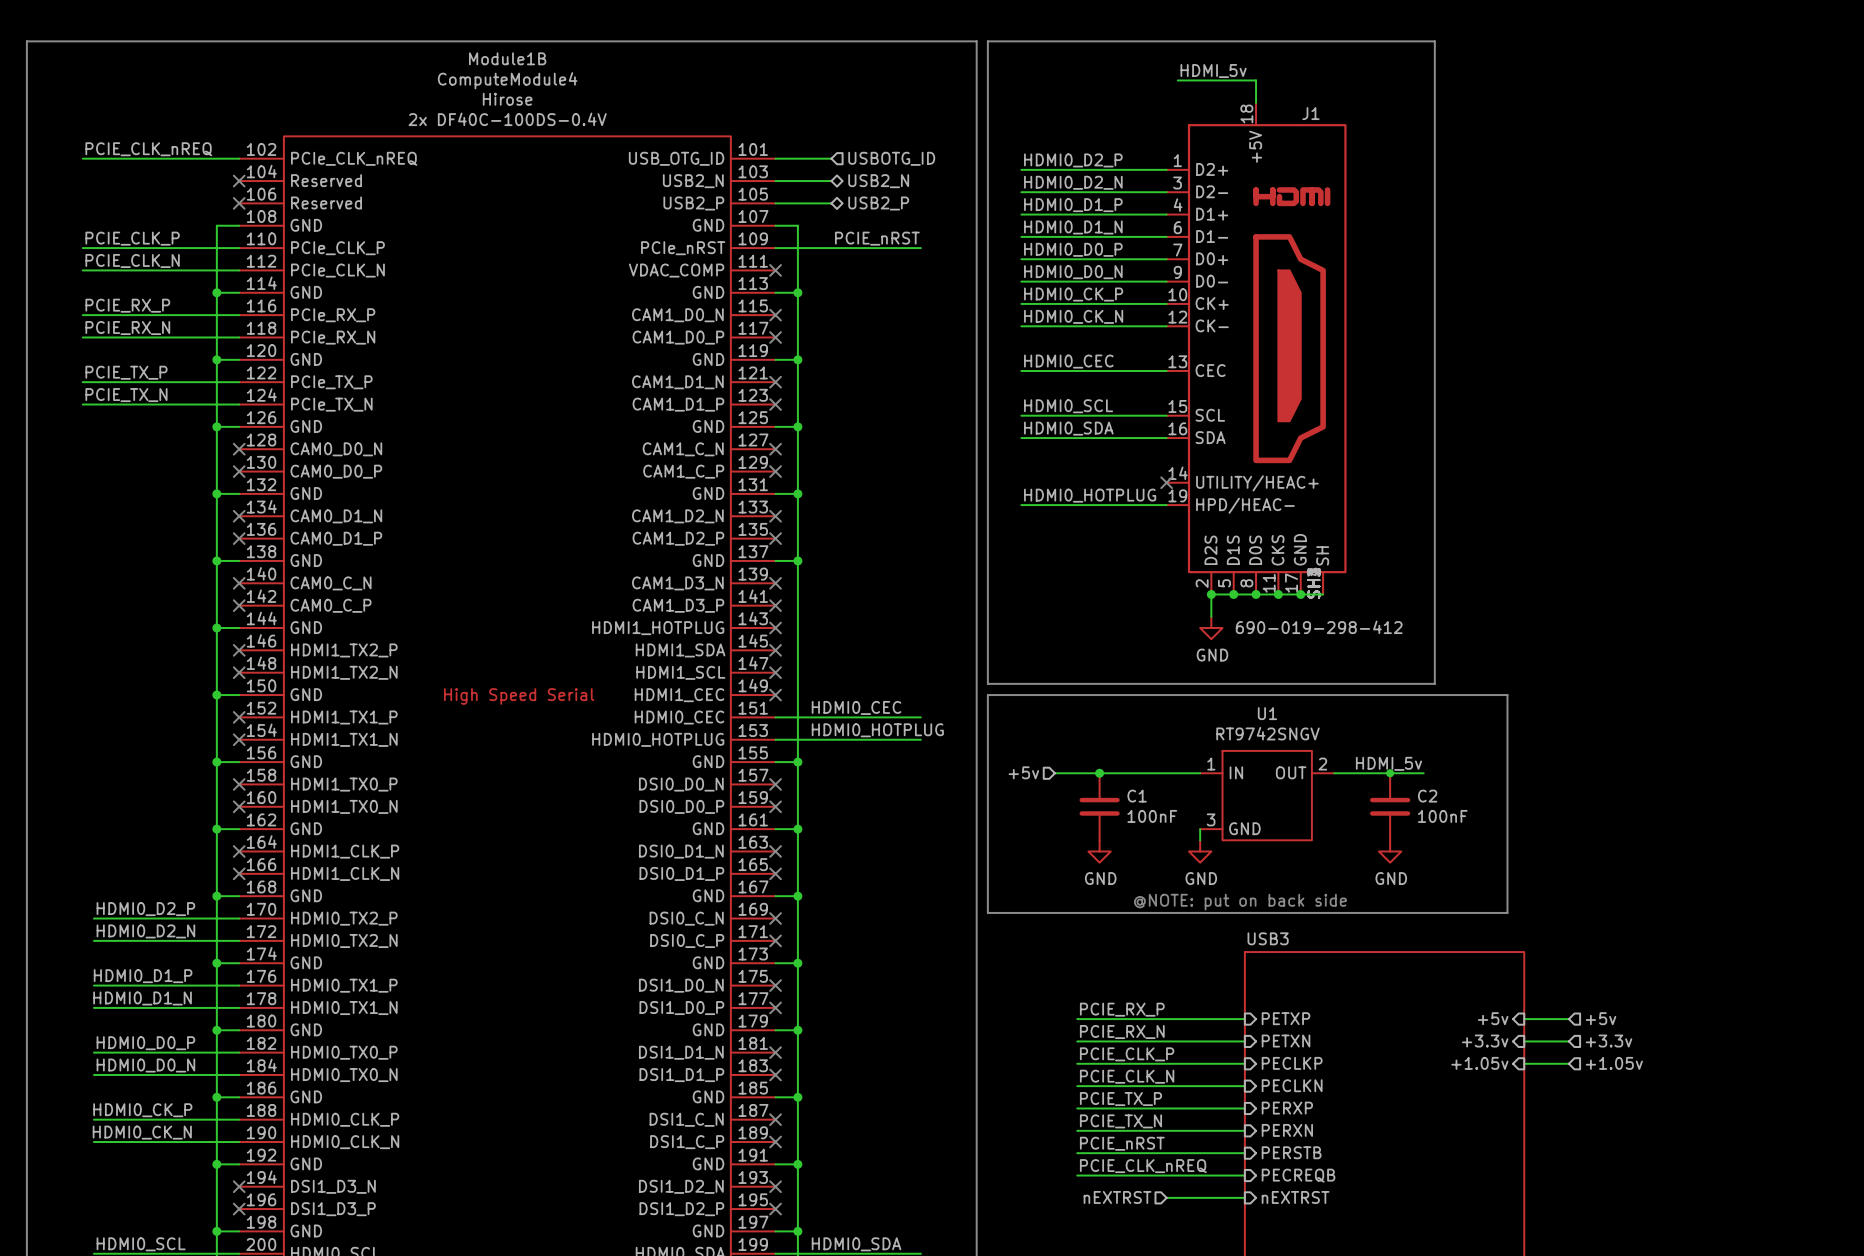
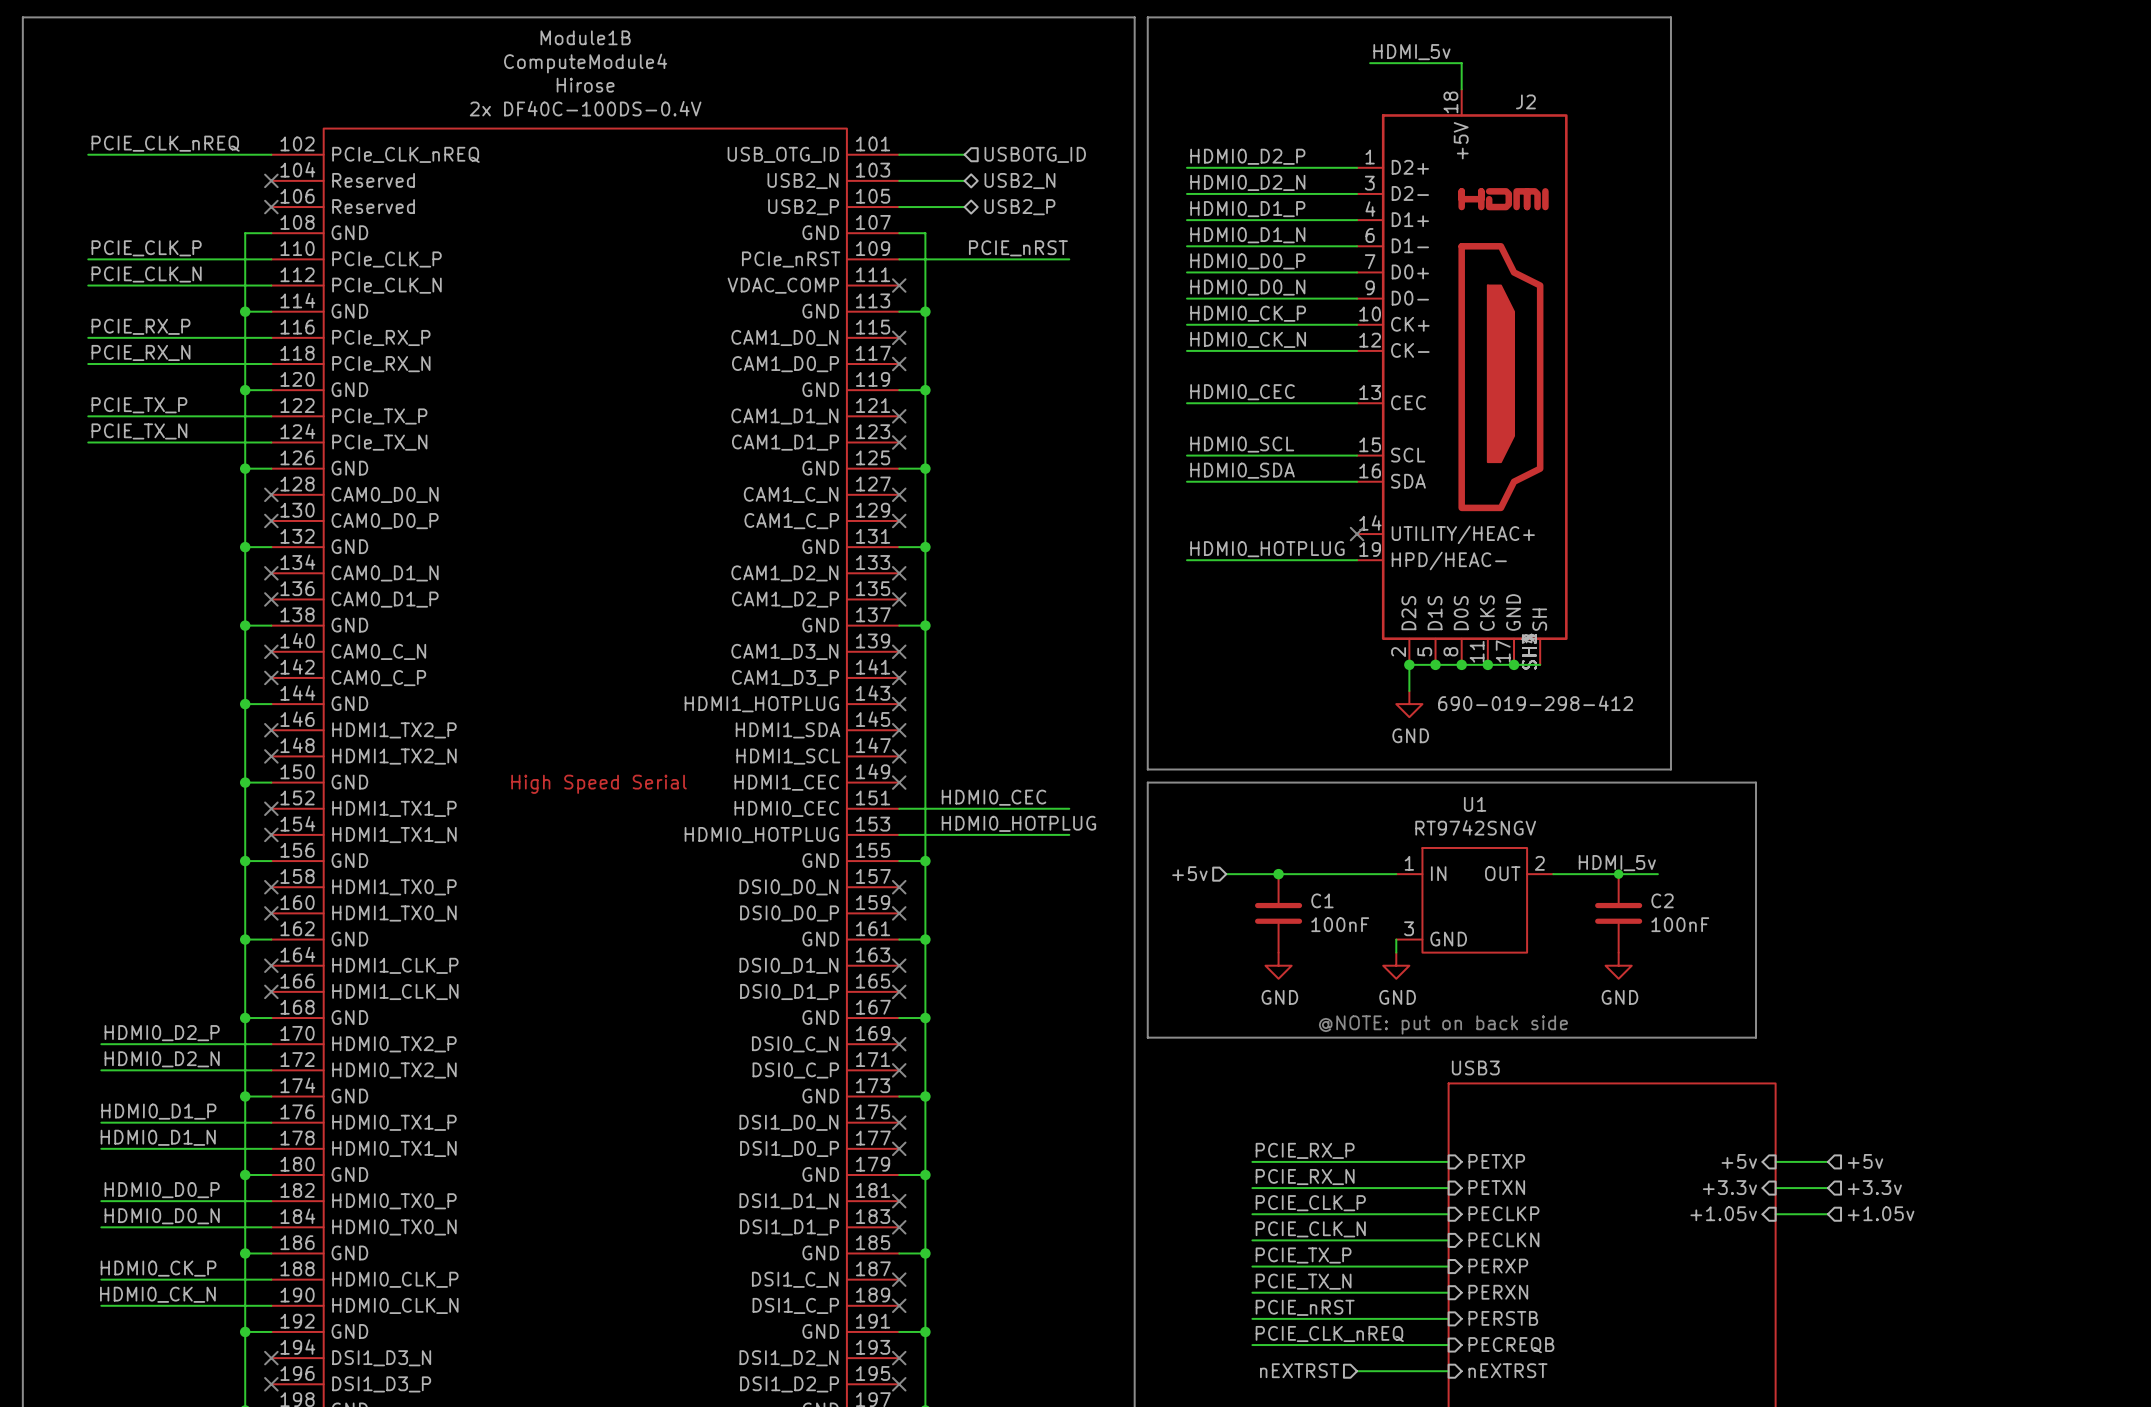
J1 name: J1 (1310, 113) -> J2 (1525, 101)

